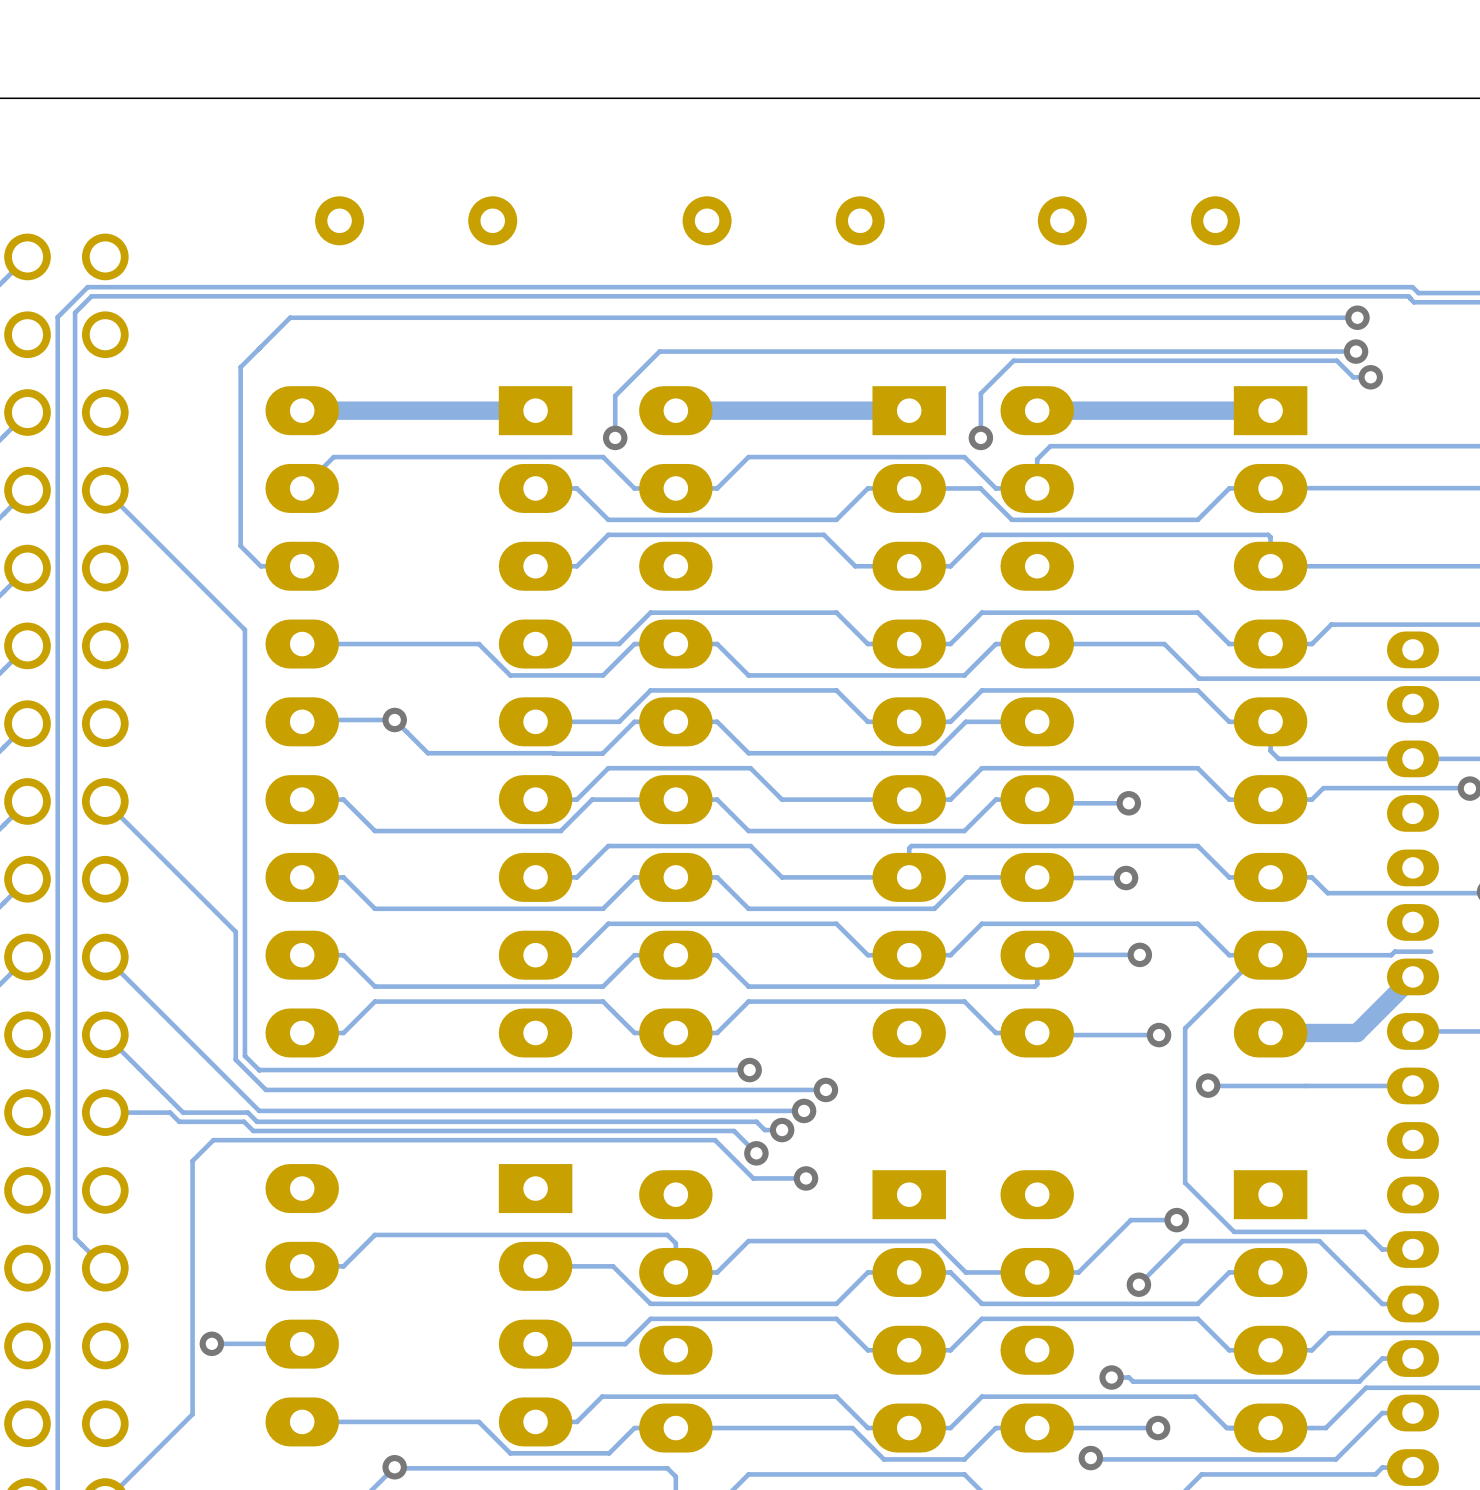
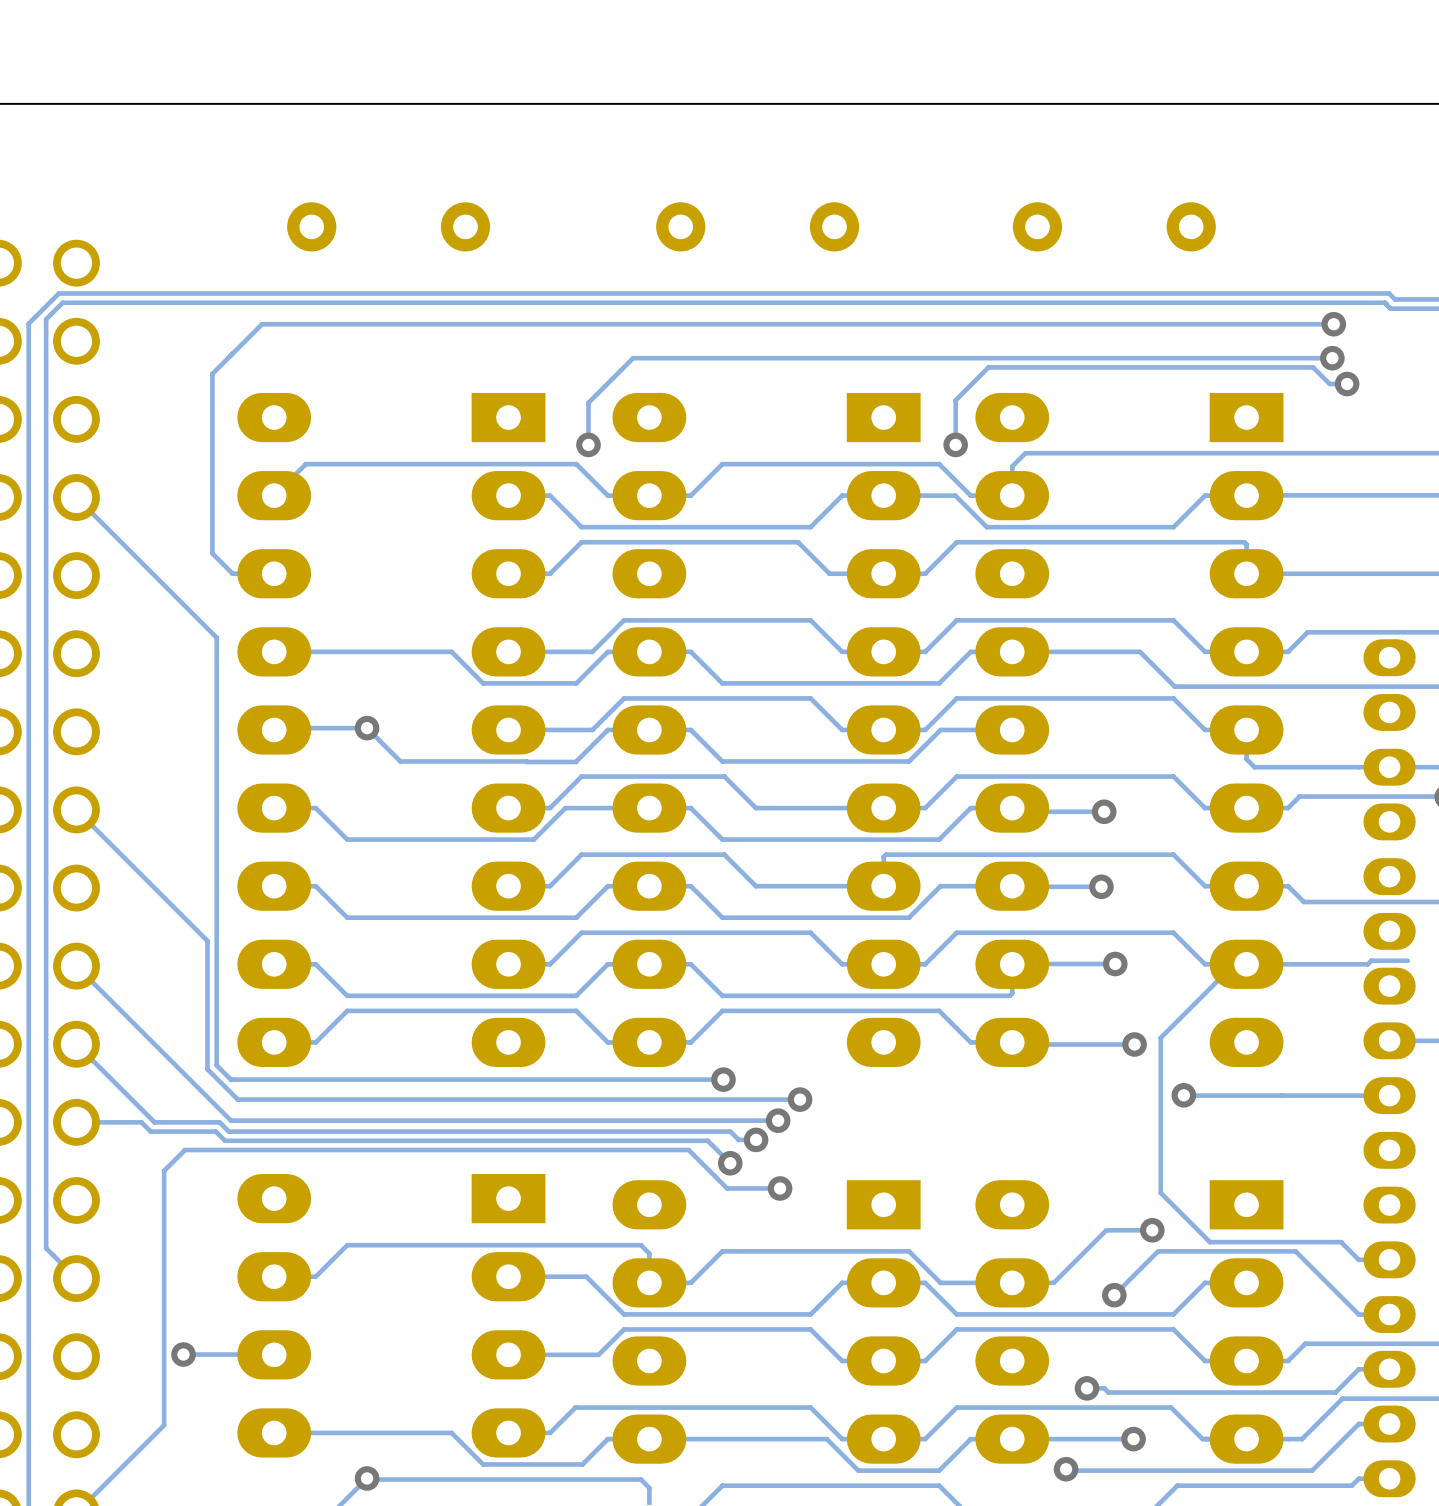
track: (535, 410) (302, 410) -> none
track: (909, 410) (675, 410) -> none
track: (1270, 410) (1037, 410) -> none
track: (1412, 976) (1356, 1032) (1270, 1032) -> none

